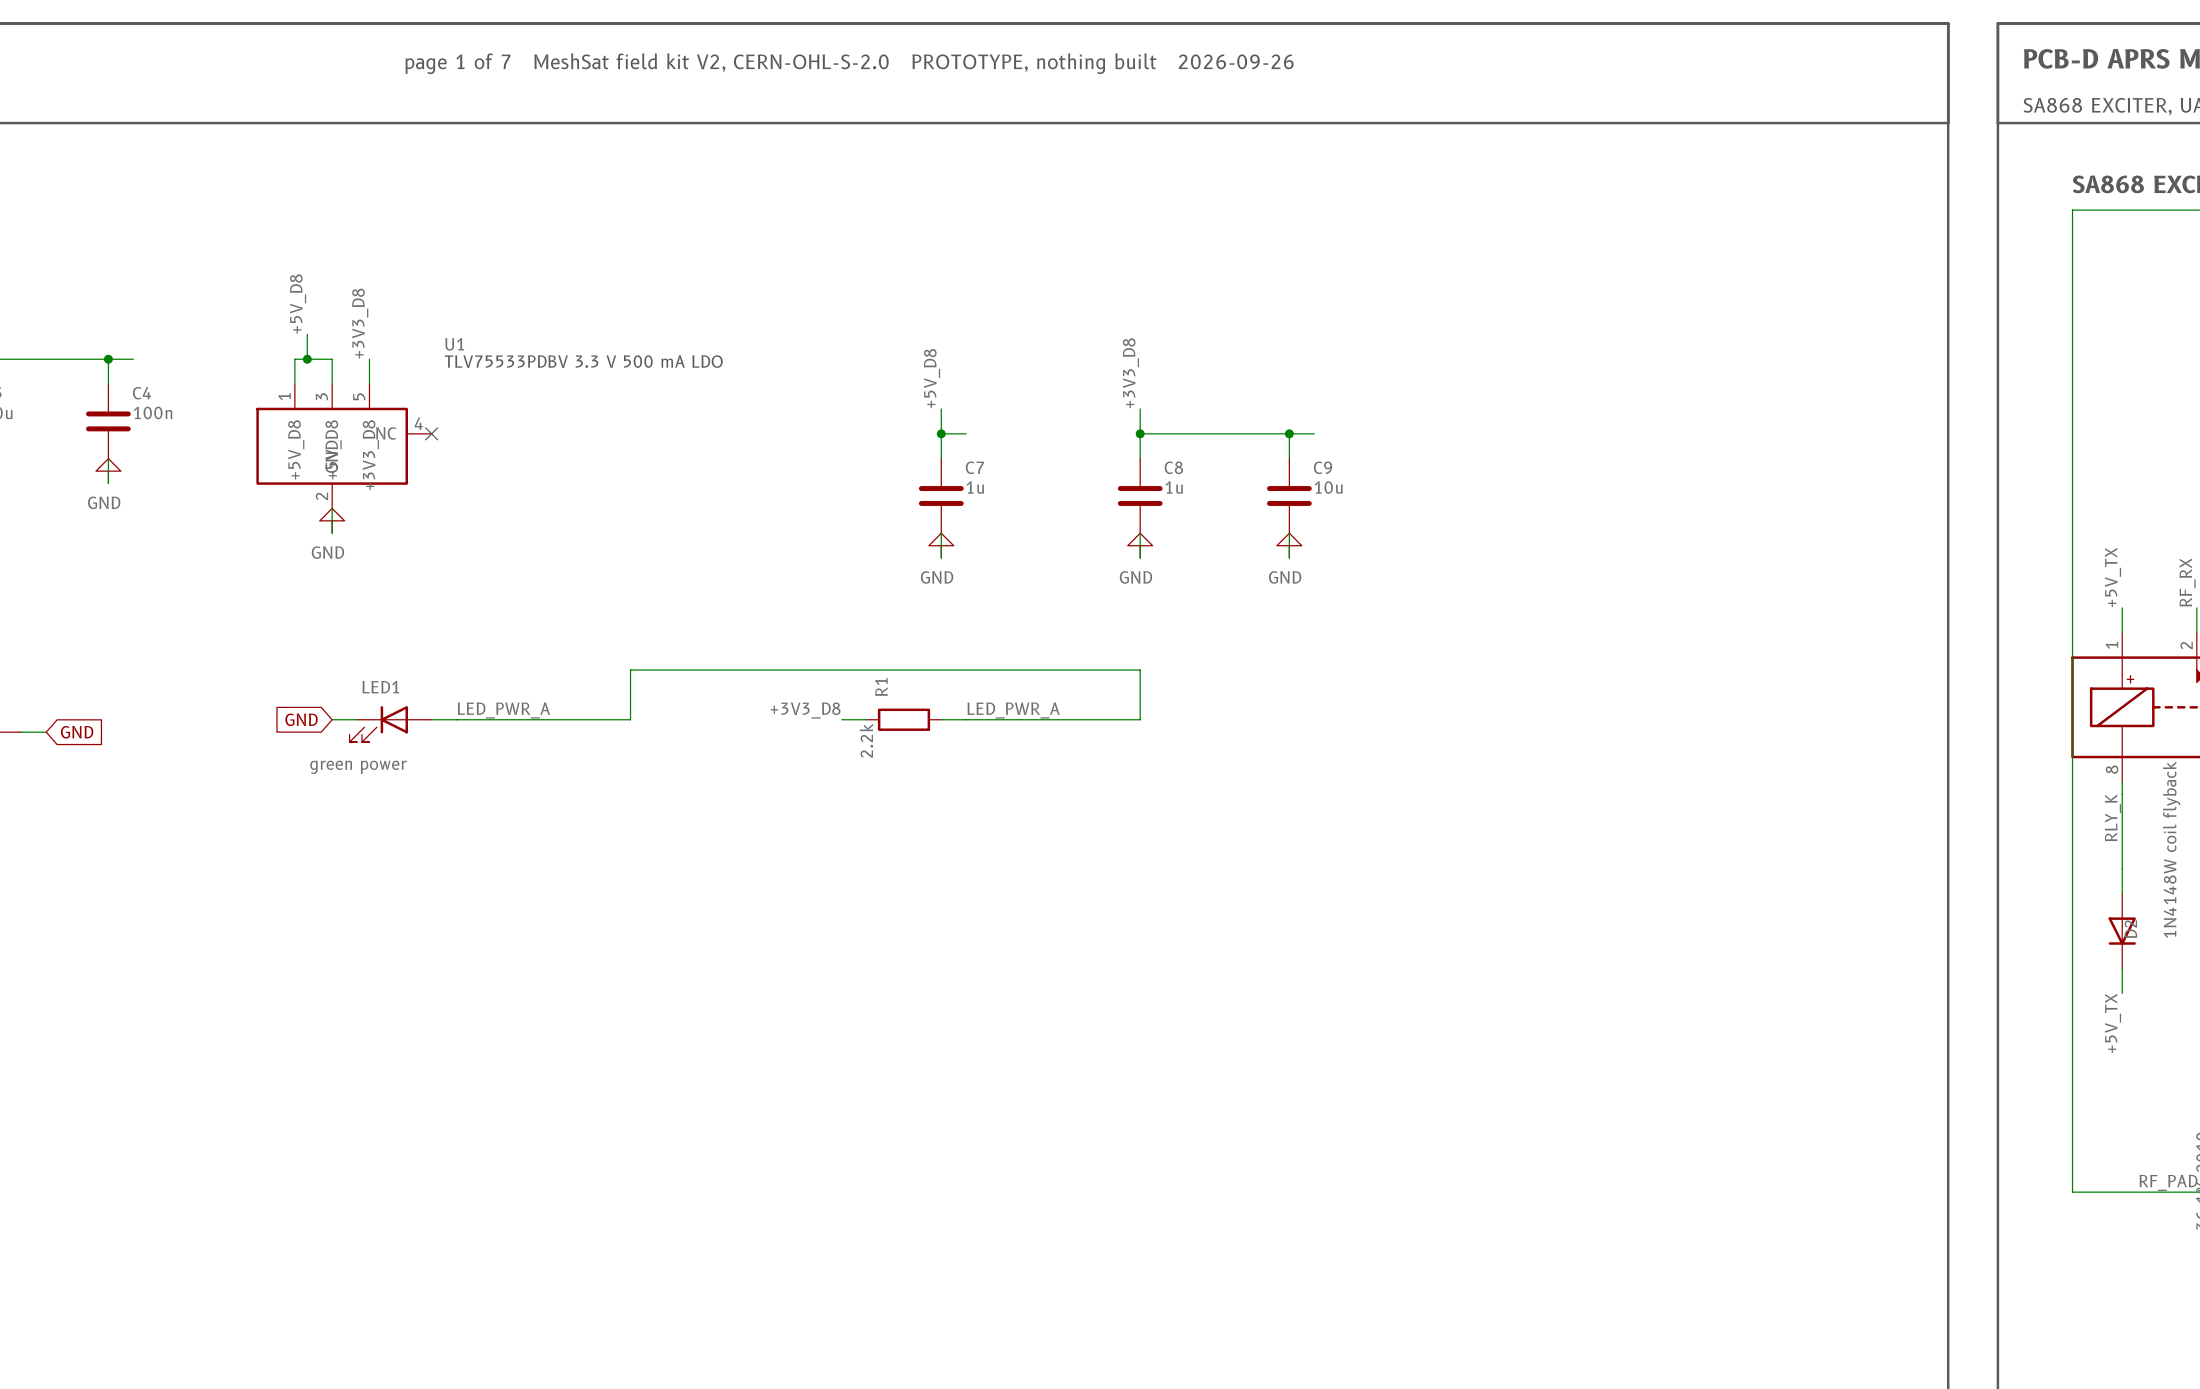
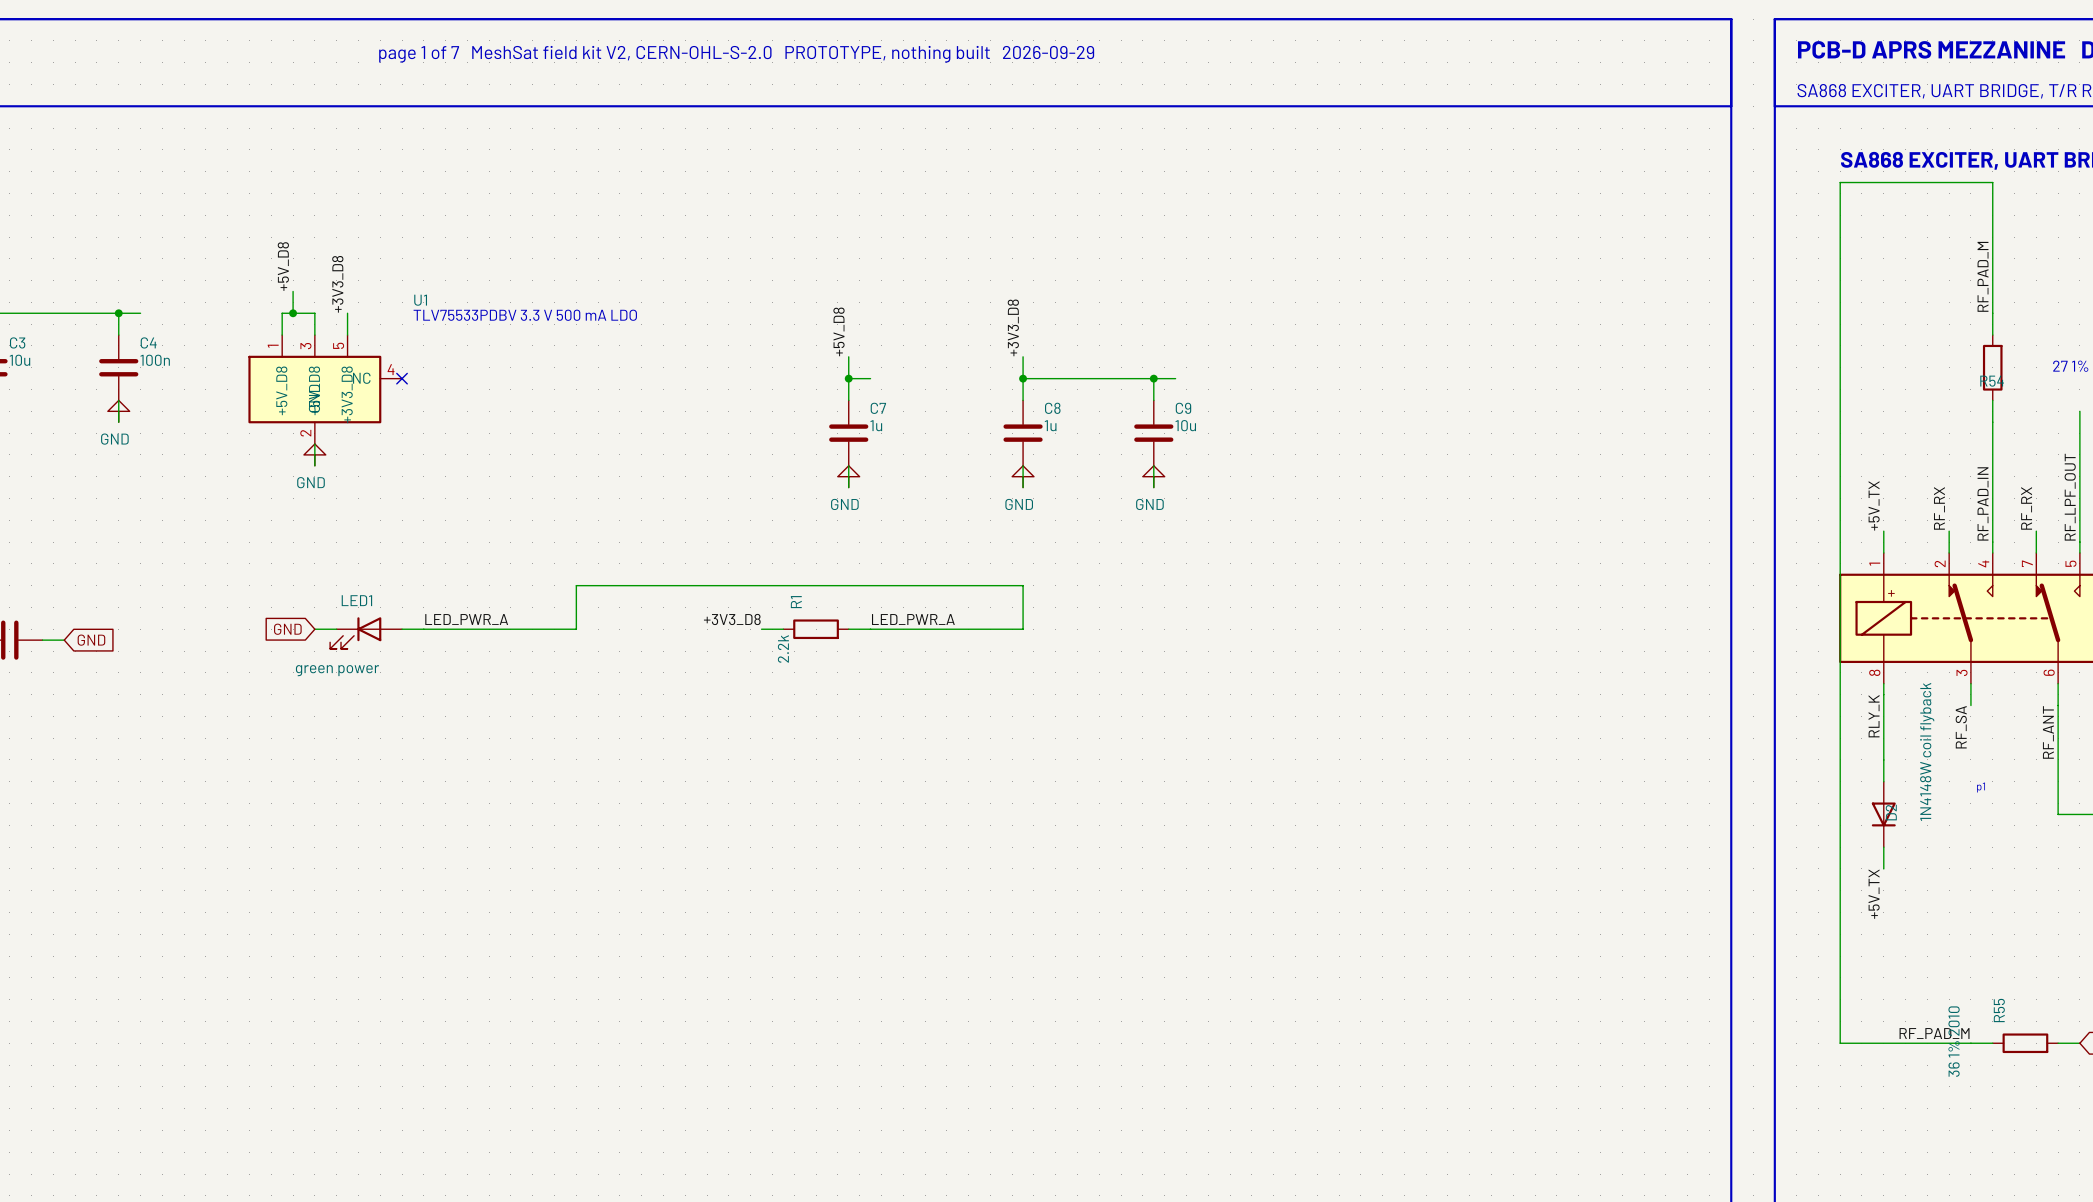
text: page 1 of 7 MeshSat field kit V2, CERN-OHL-S-2.0 PROTOTYPE, nothing built 2026-09-26 (849, 63) -> page 1 of 7 MeshSat field kit V2, CERN-OHL-S-2.0 PROTOTYPE, nothing built 2026-09-29 (736, 54)

